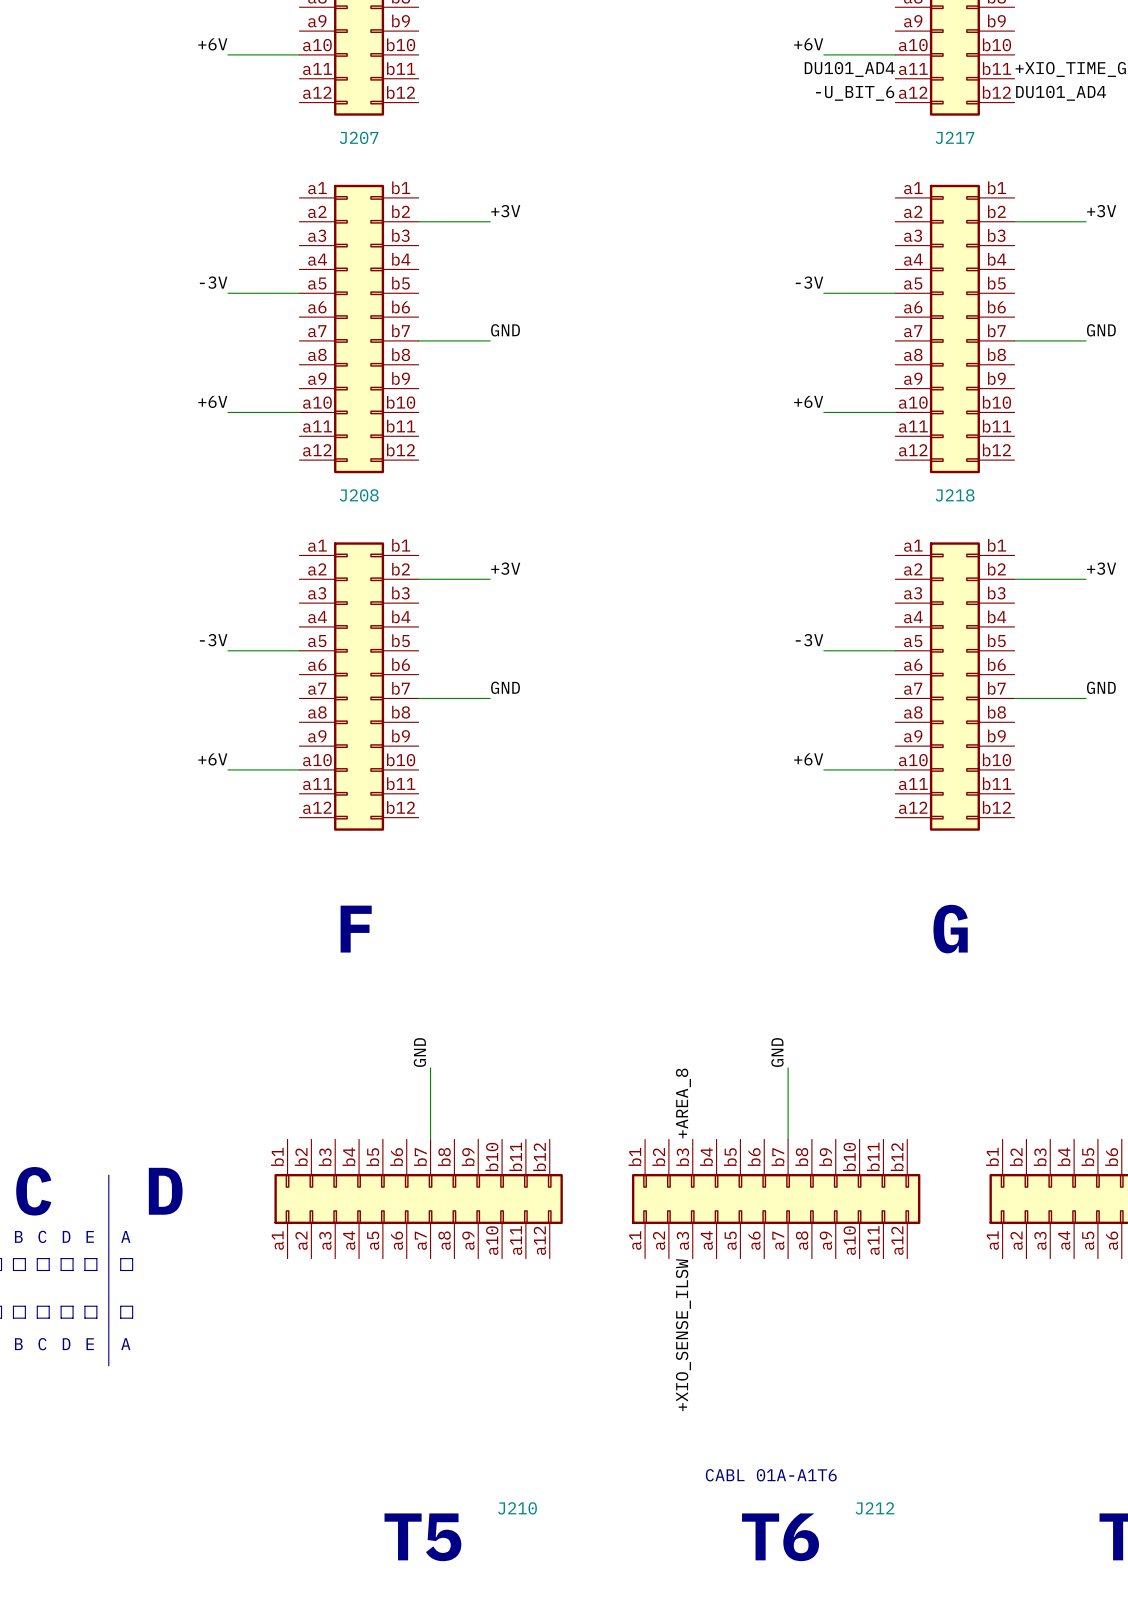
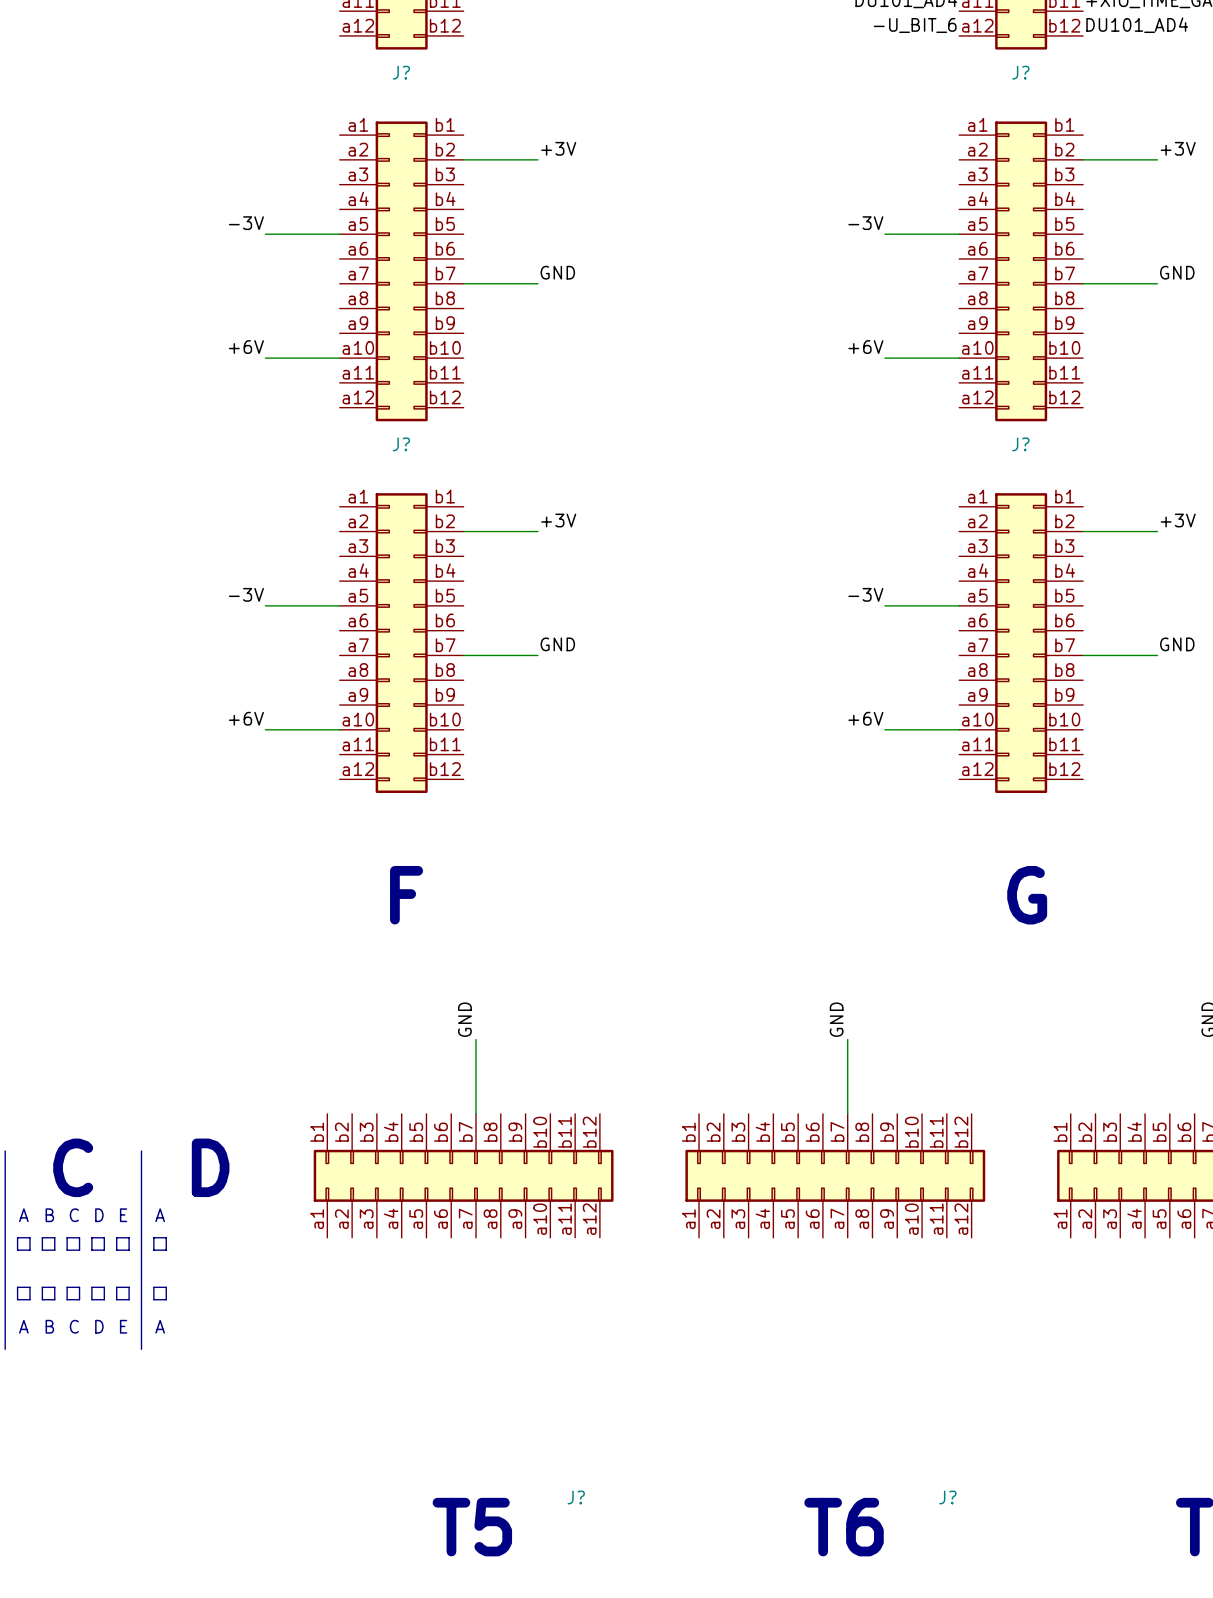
J207 name: J207 (359, 137) -> J? (401, 72)
J217 name: J217 (954, 137) -> J? (1020, 72)
J208 name: J208 (359, 495) -> J? (401, 444)
J218 name: J218 (955, 495) -> J? (1020, 444)
label: +AREA_8 (683, 1103) -> none
label: +XIO_SENSE_ILSW (683, 1335) -> none
text: CABL 01A-A1T6 (771, 1475) -> none
J210 name: J210 (517, 1508) -> J? (576, 1497)
J212 name: J212 (874, 1508) -> J? (947, 1497)

